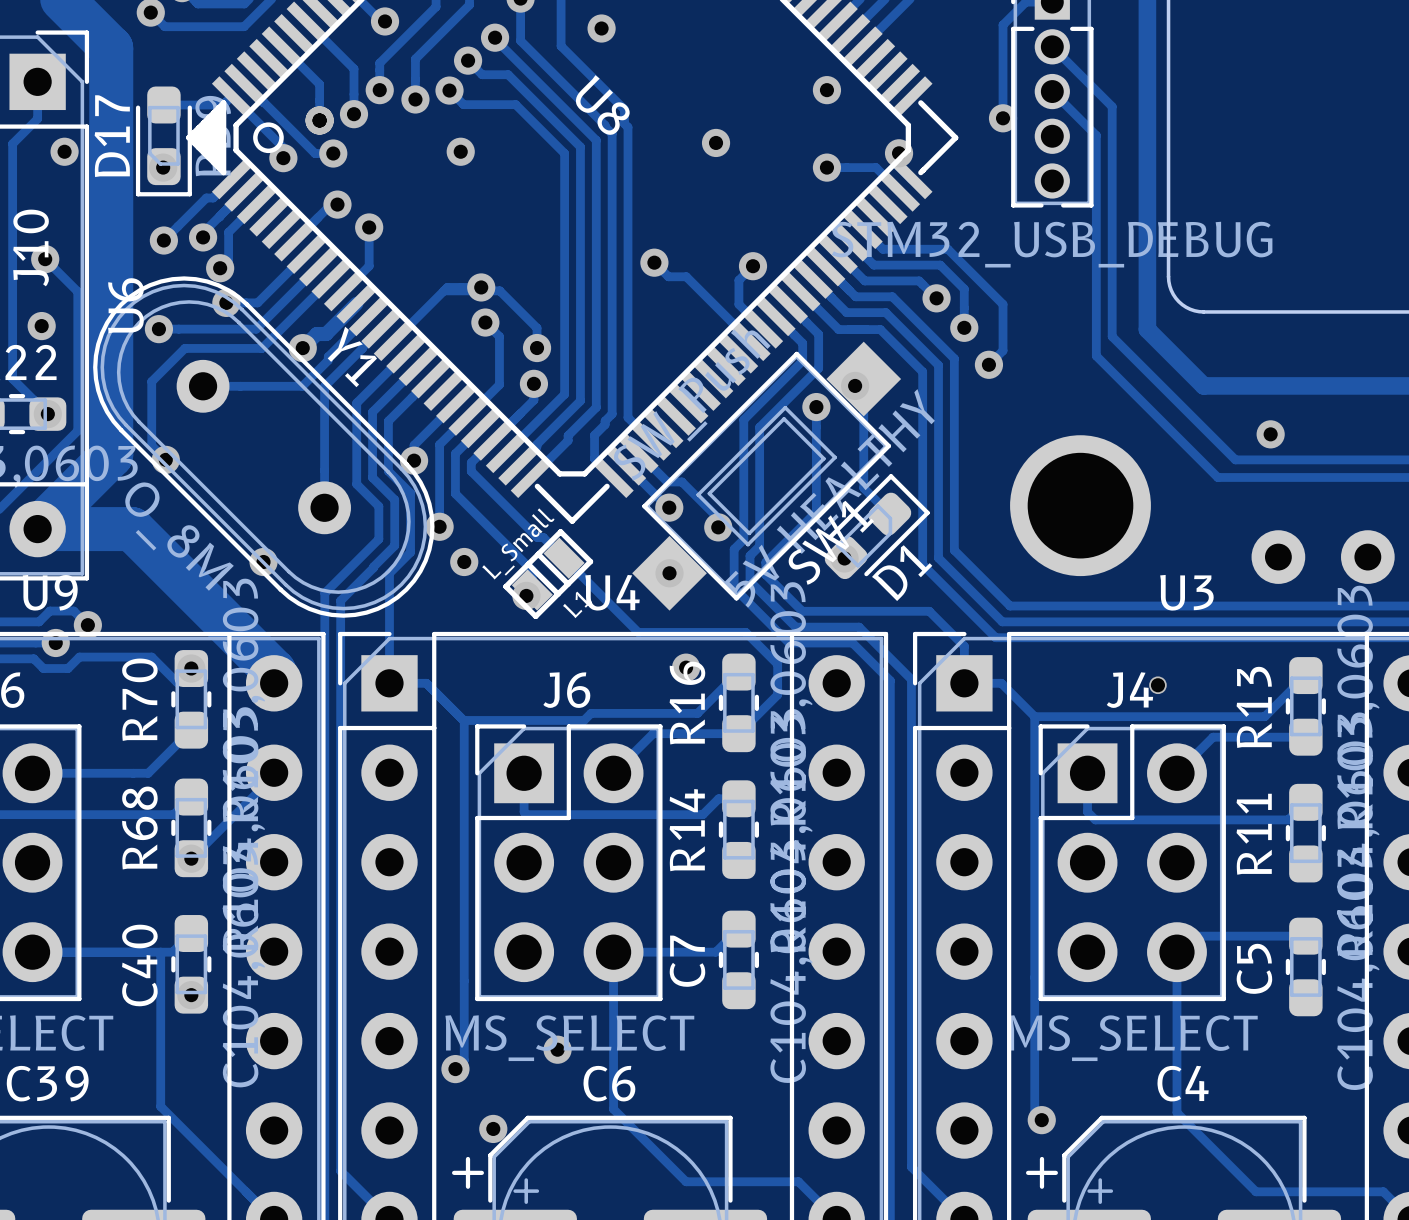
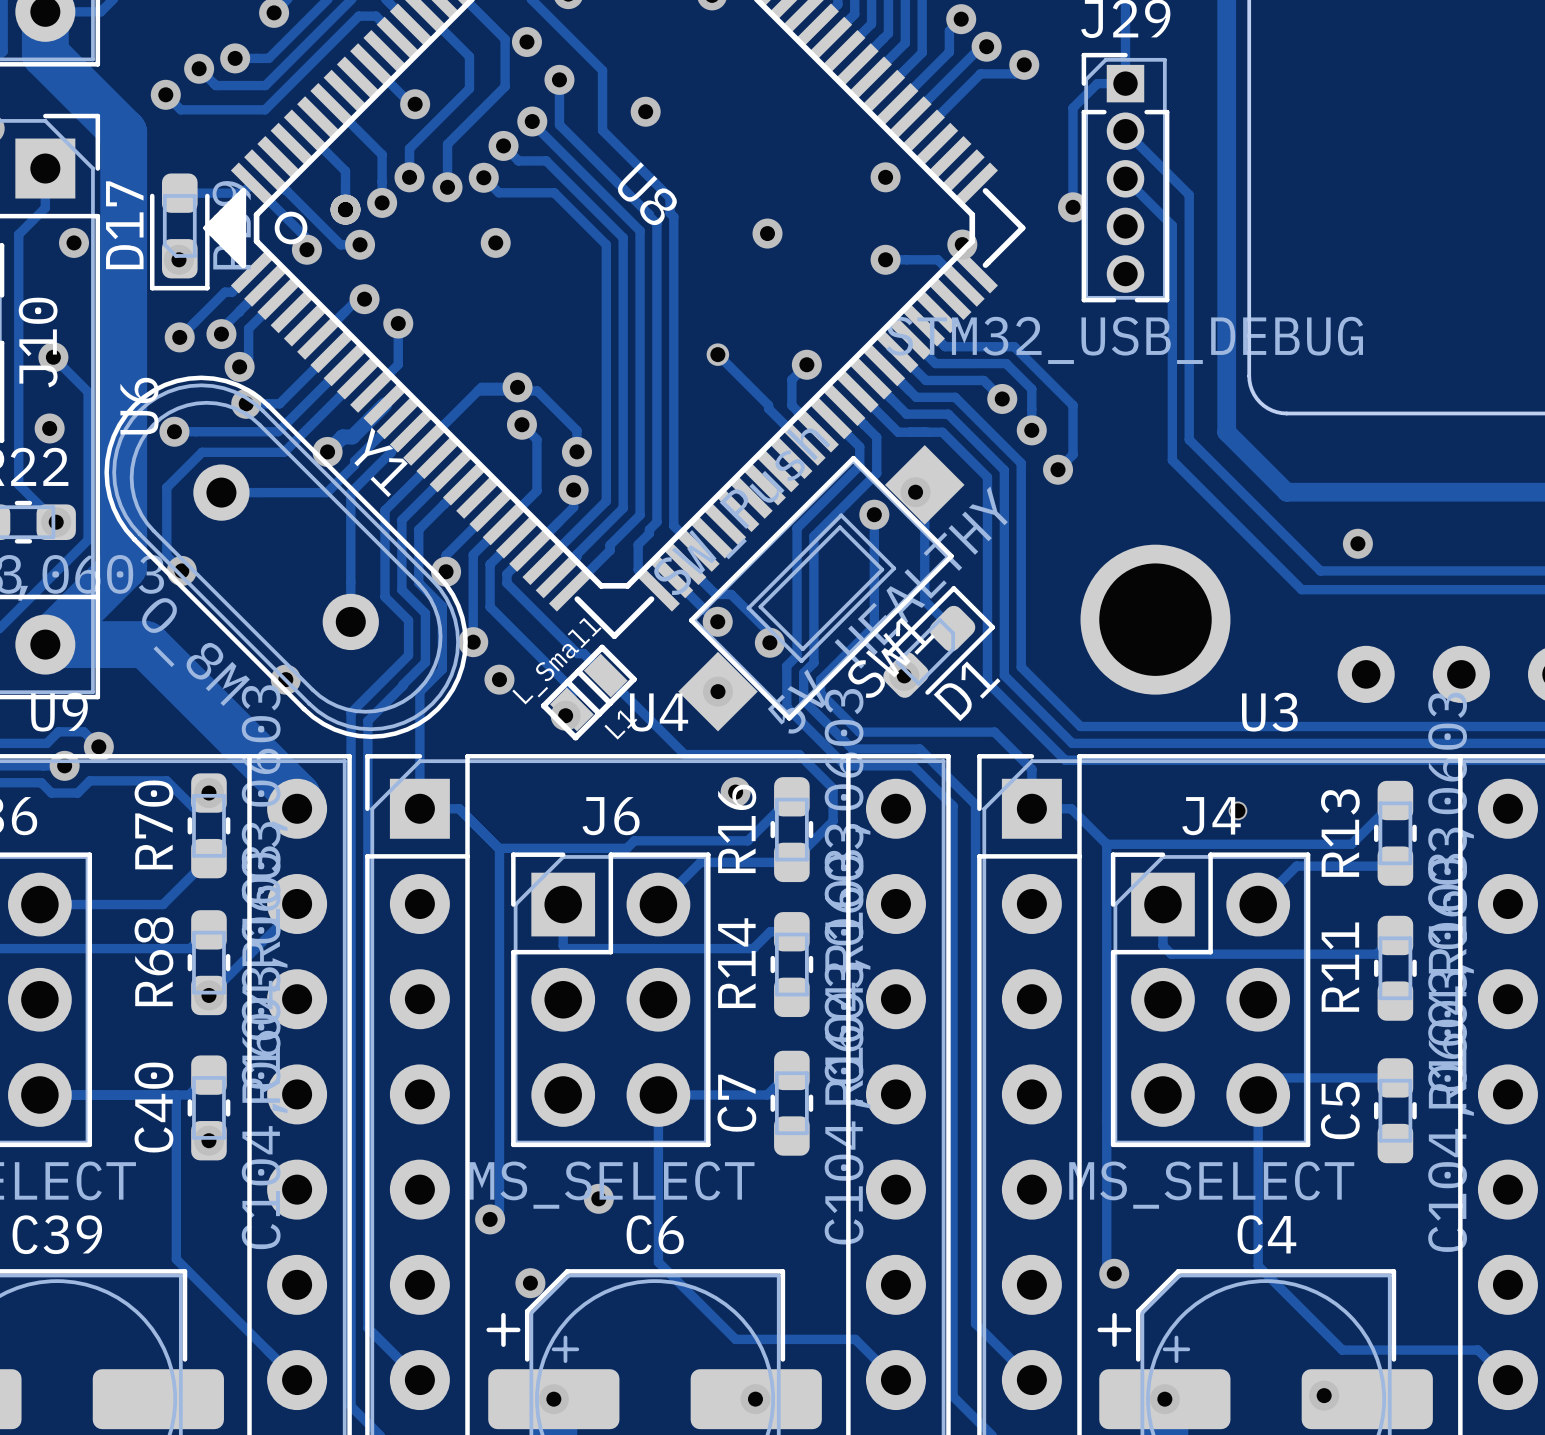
track: (654, 262) (668, 276) (686, 276) (717, 307) -> (717, 354) (768, 405) (768, 408)
via position: (654, 262) -> (717, 354)

